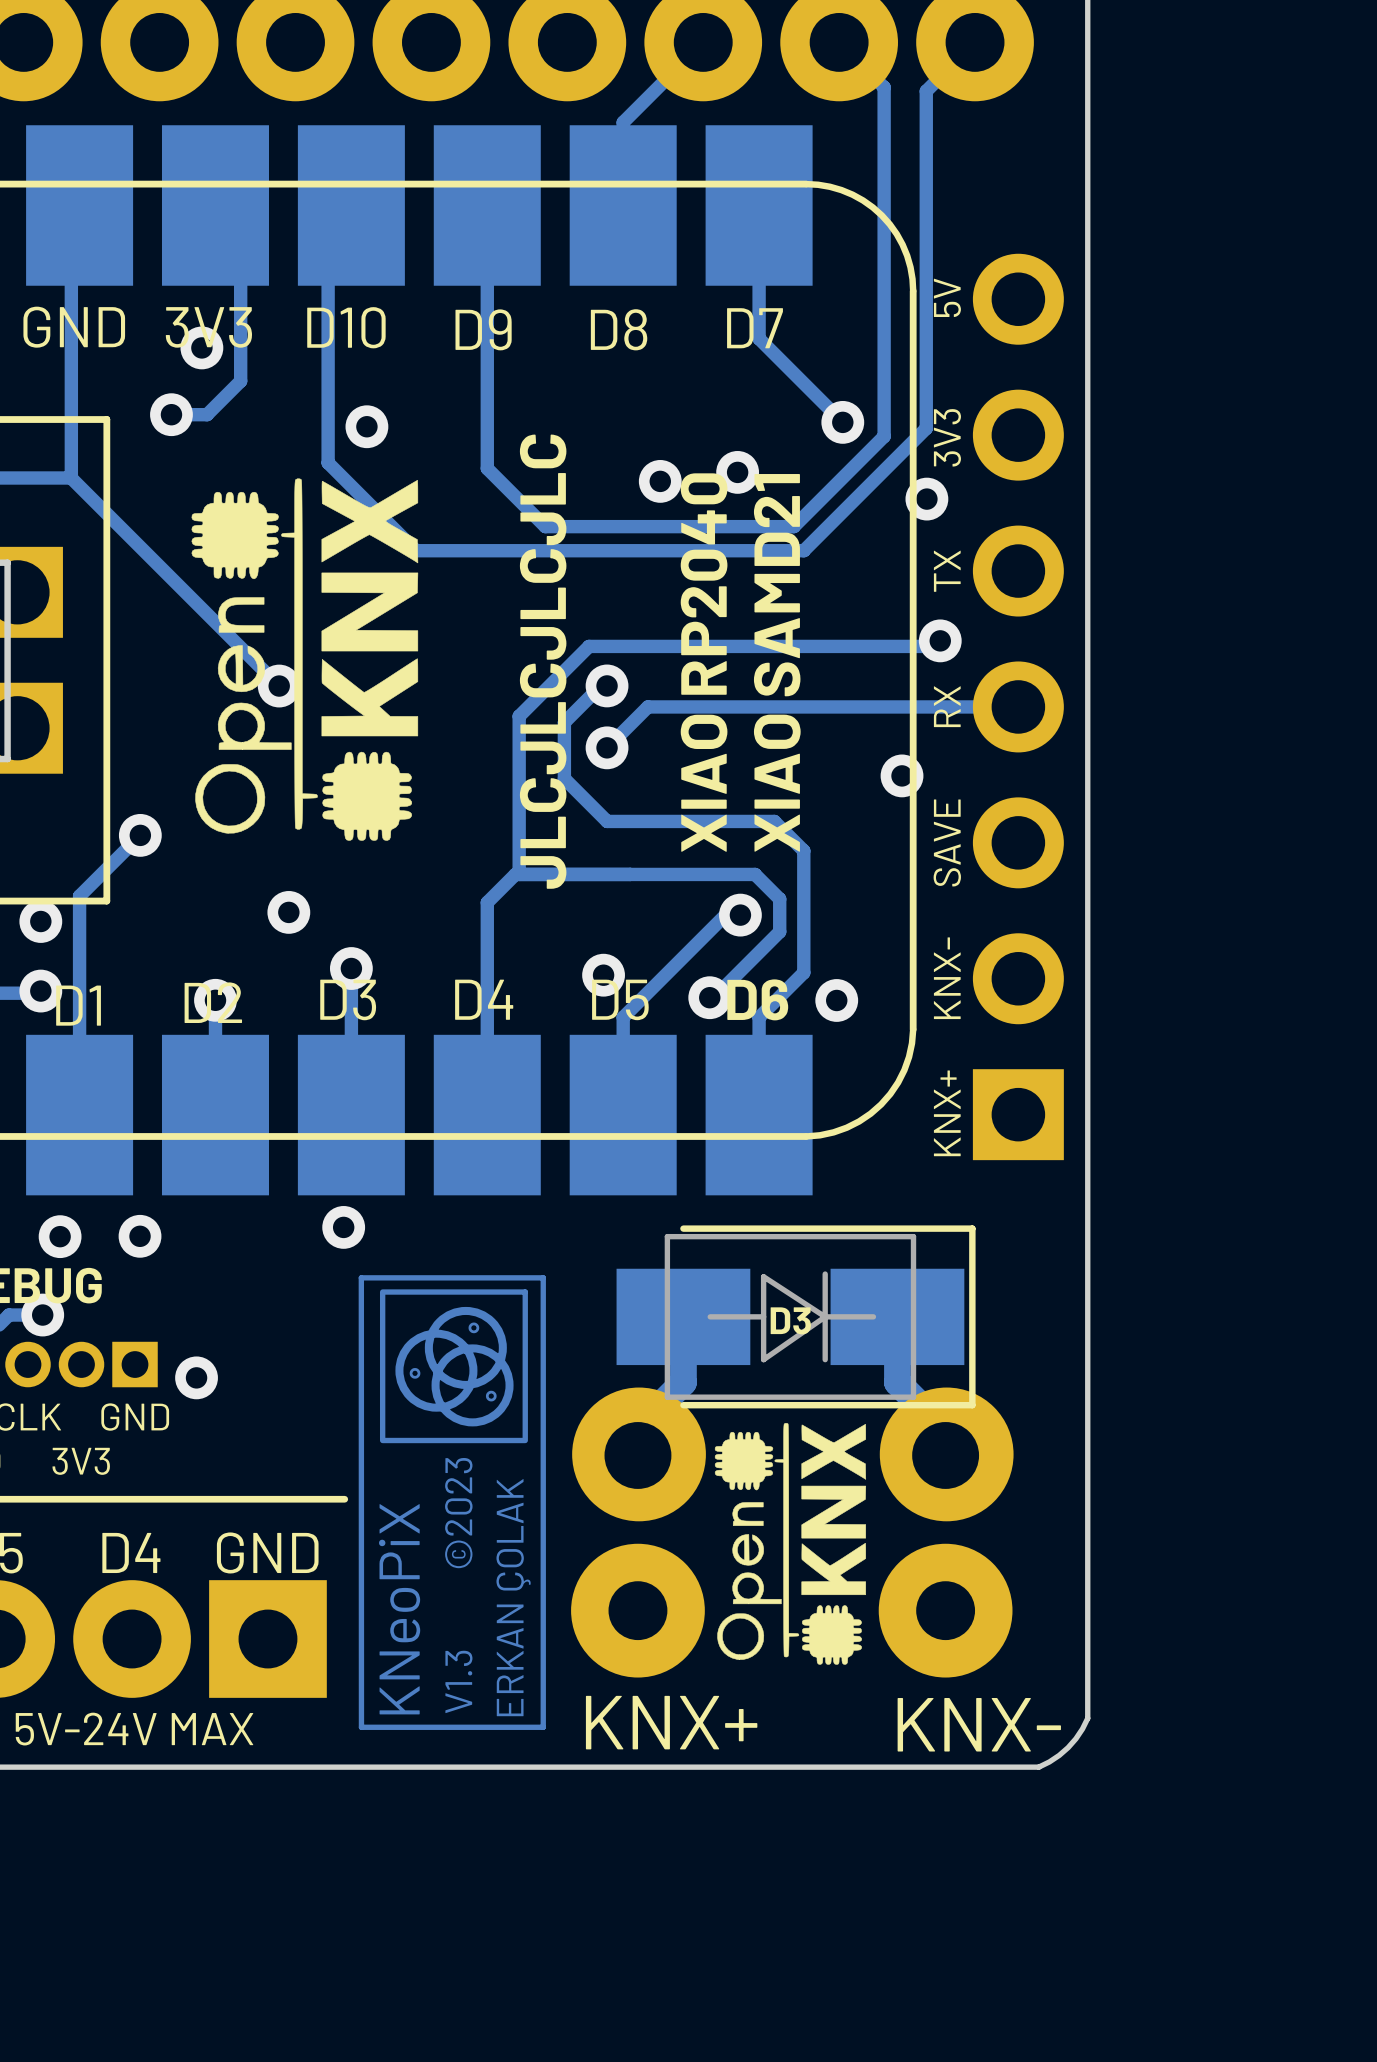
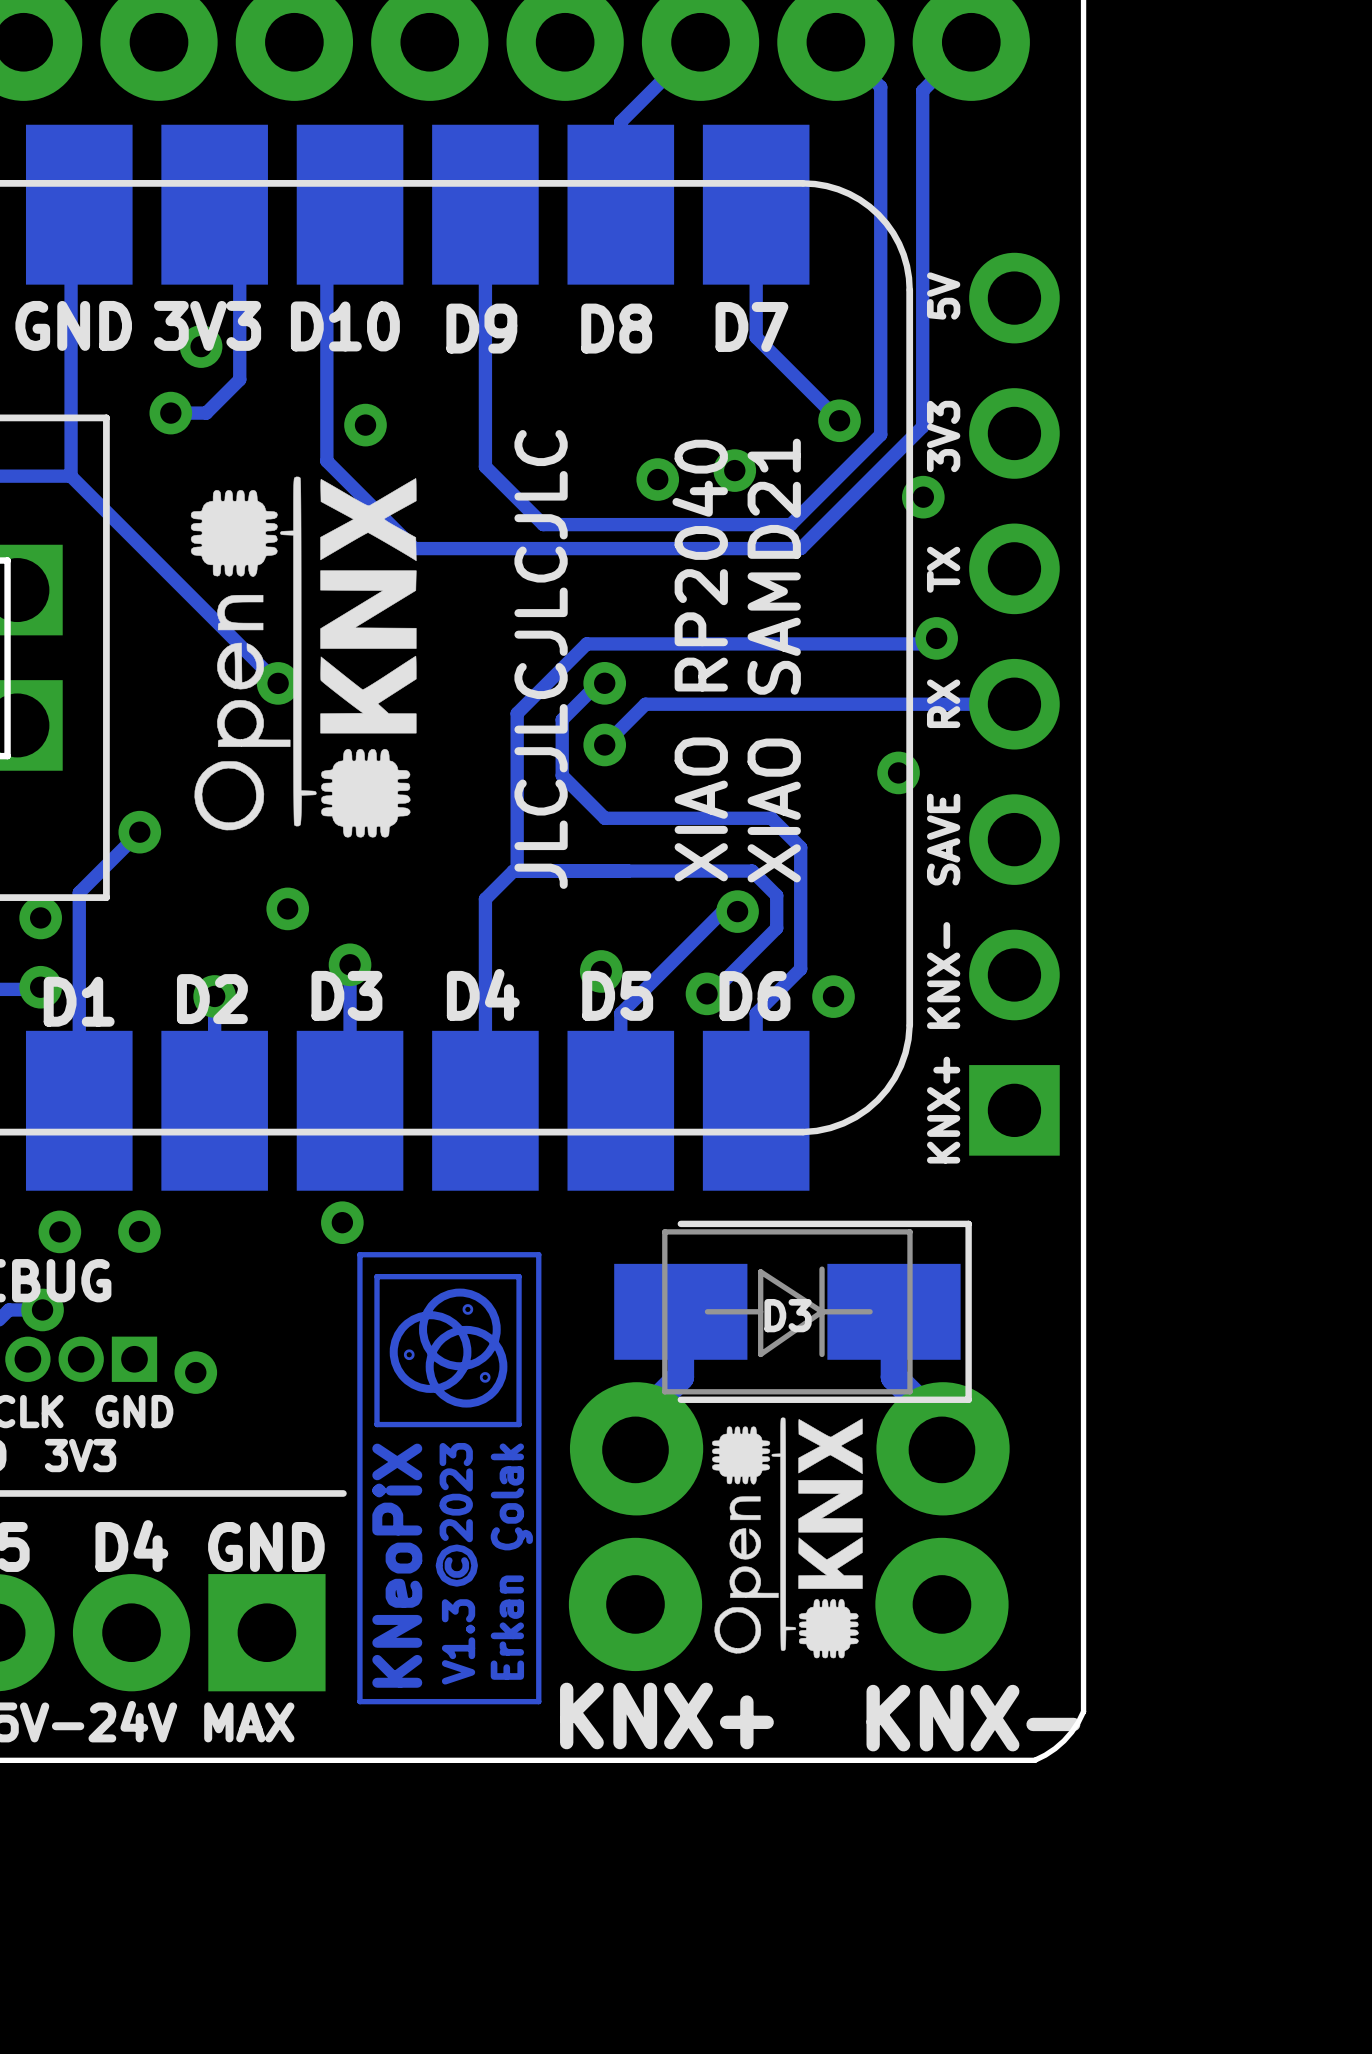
track: none -> (538, 1254) (359, 1254) (359, 1701) (538, 1701) (538, 1254)
drawing: [358, 1275, 546, 1730] -> none
track: none -> (519, 1276) (377, 1276) (377, 1424) (519, 1424) (519, 1276)
drawing: none -> [389, 1288, 508, 1408]
text: none -> ©2023 (456, 1514)
text: none -> Erkan Çolak (511, 1561)
text: none -> KNeoPiX (397, 1565)
text: none -> V1.3 (458, 1641)

